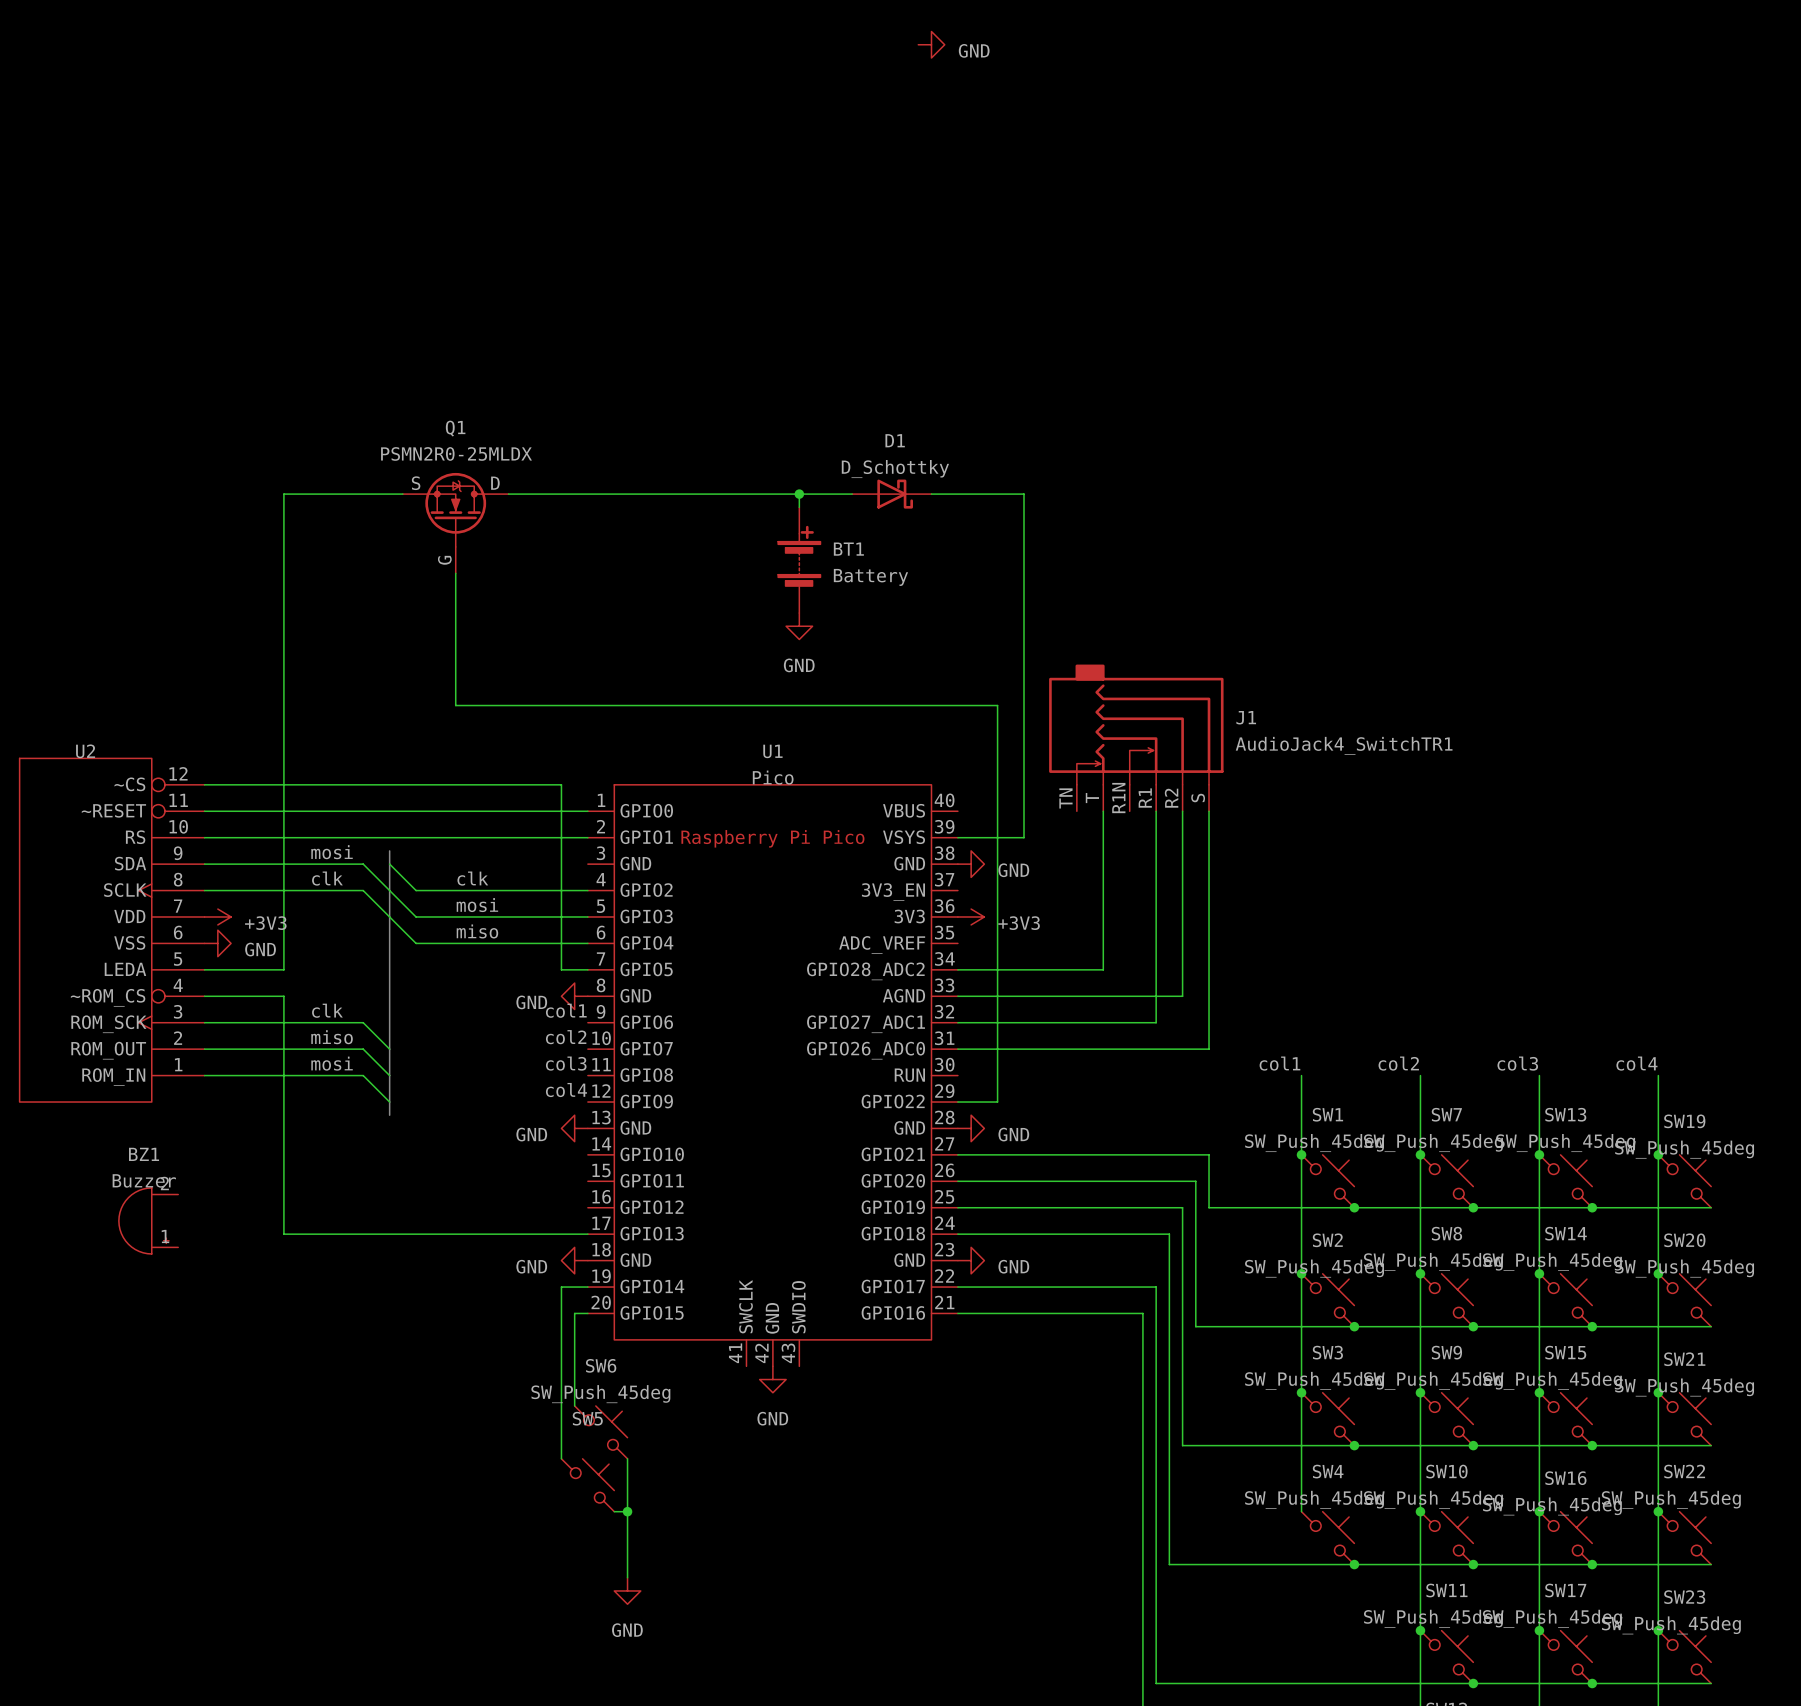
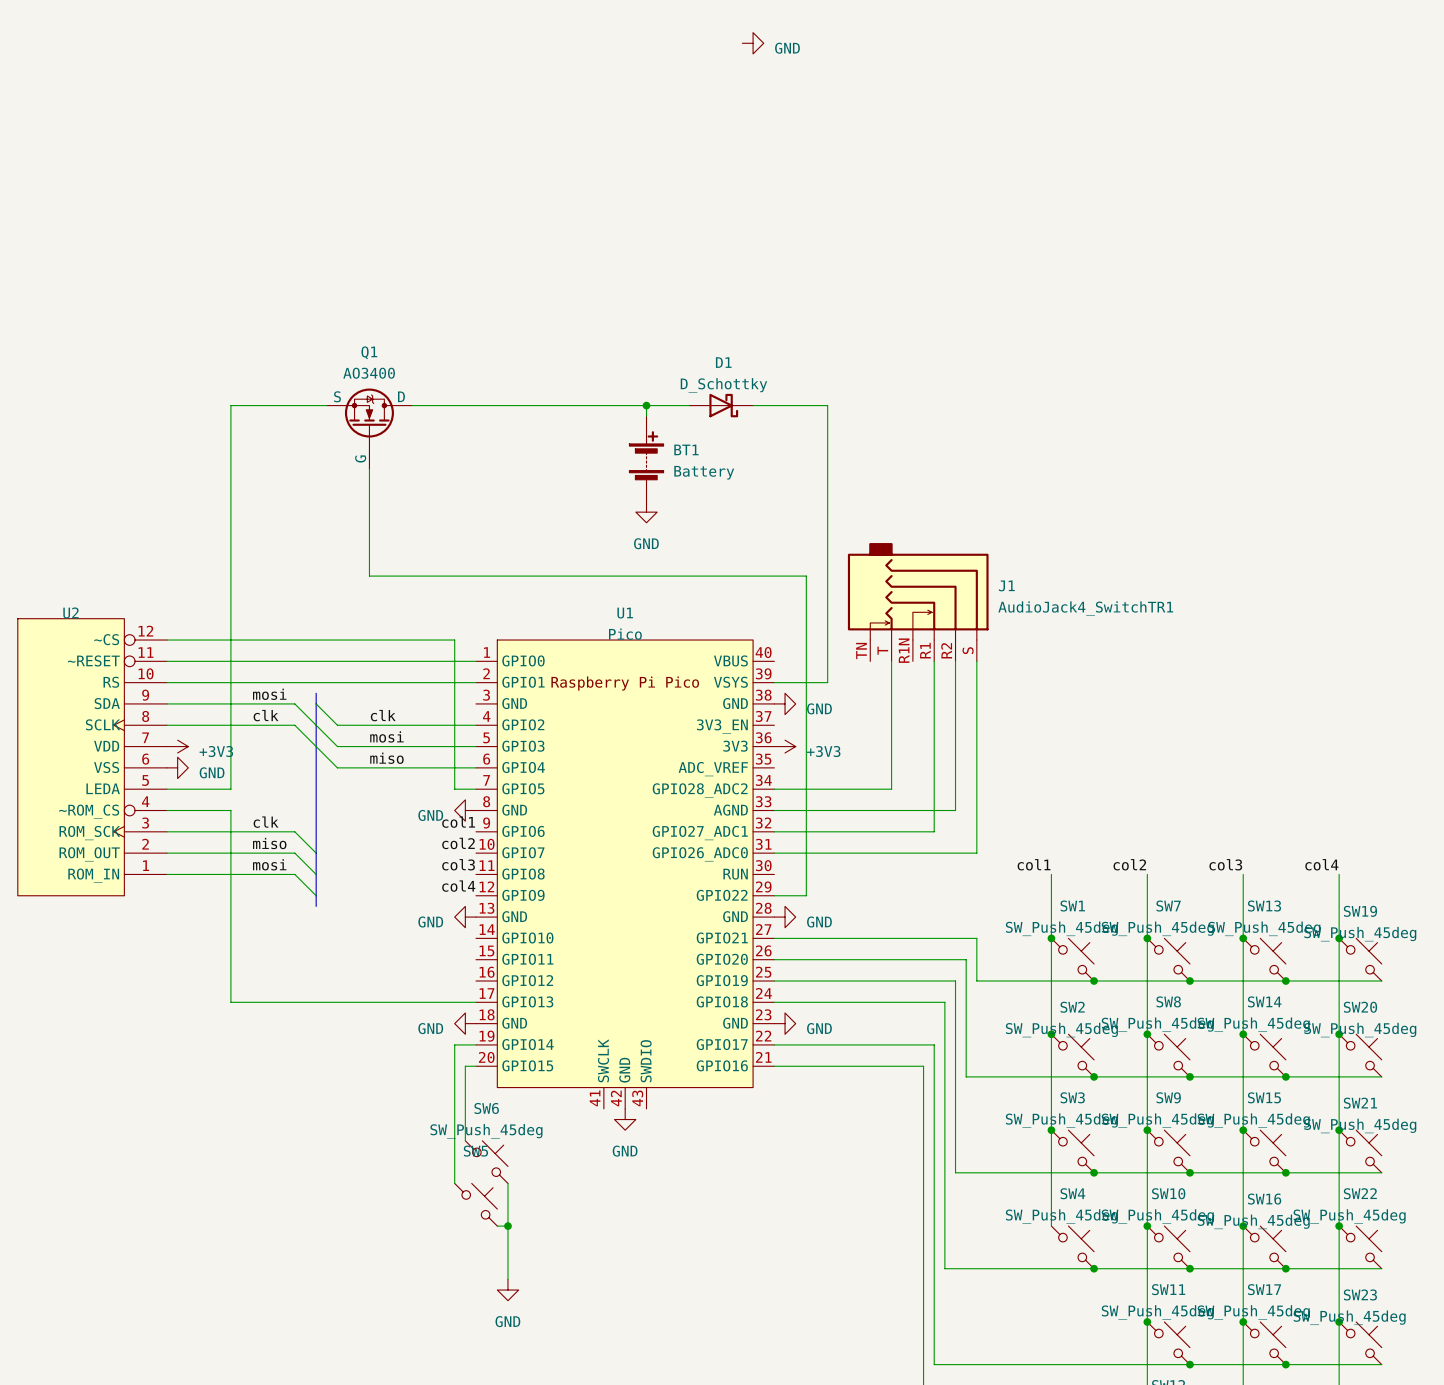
Q1 value: PSMN2R0-25MLDX (456, 453) -> AO3400 (369, 373)
BZ1: Buzzer (148, 1220) -> none

